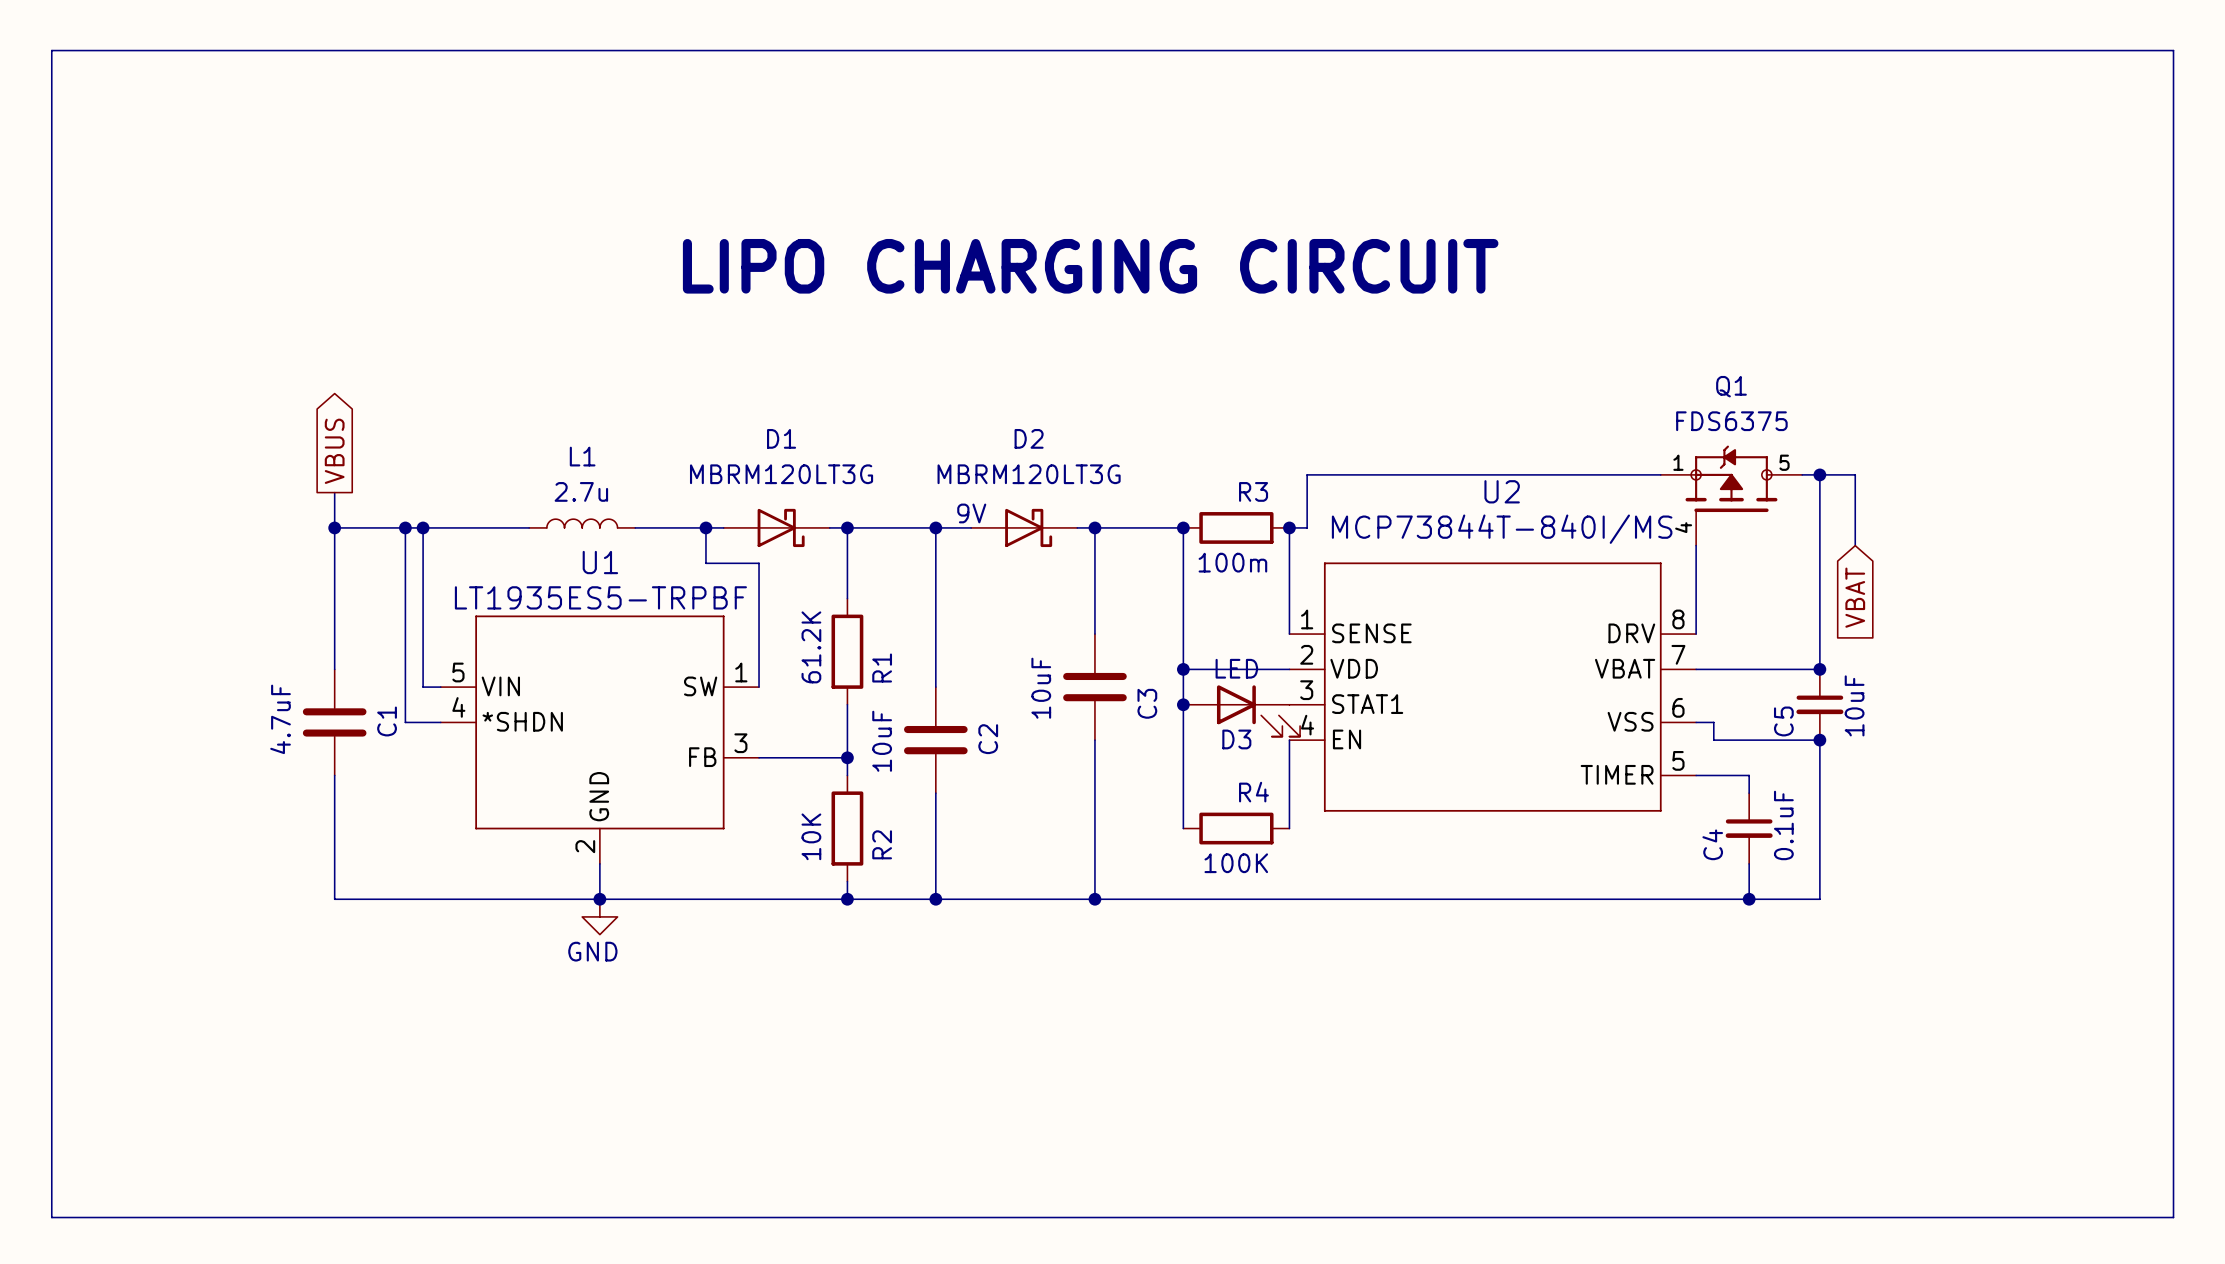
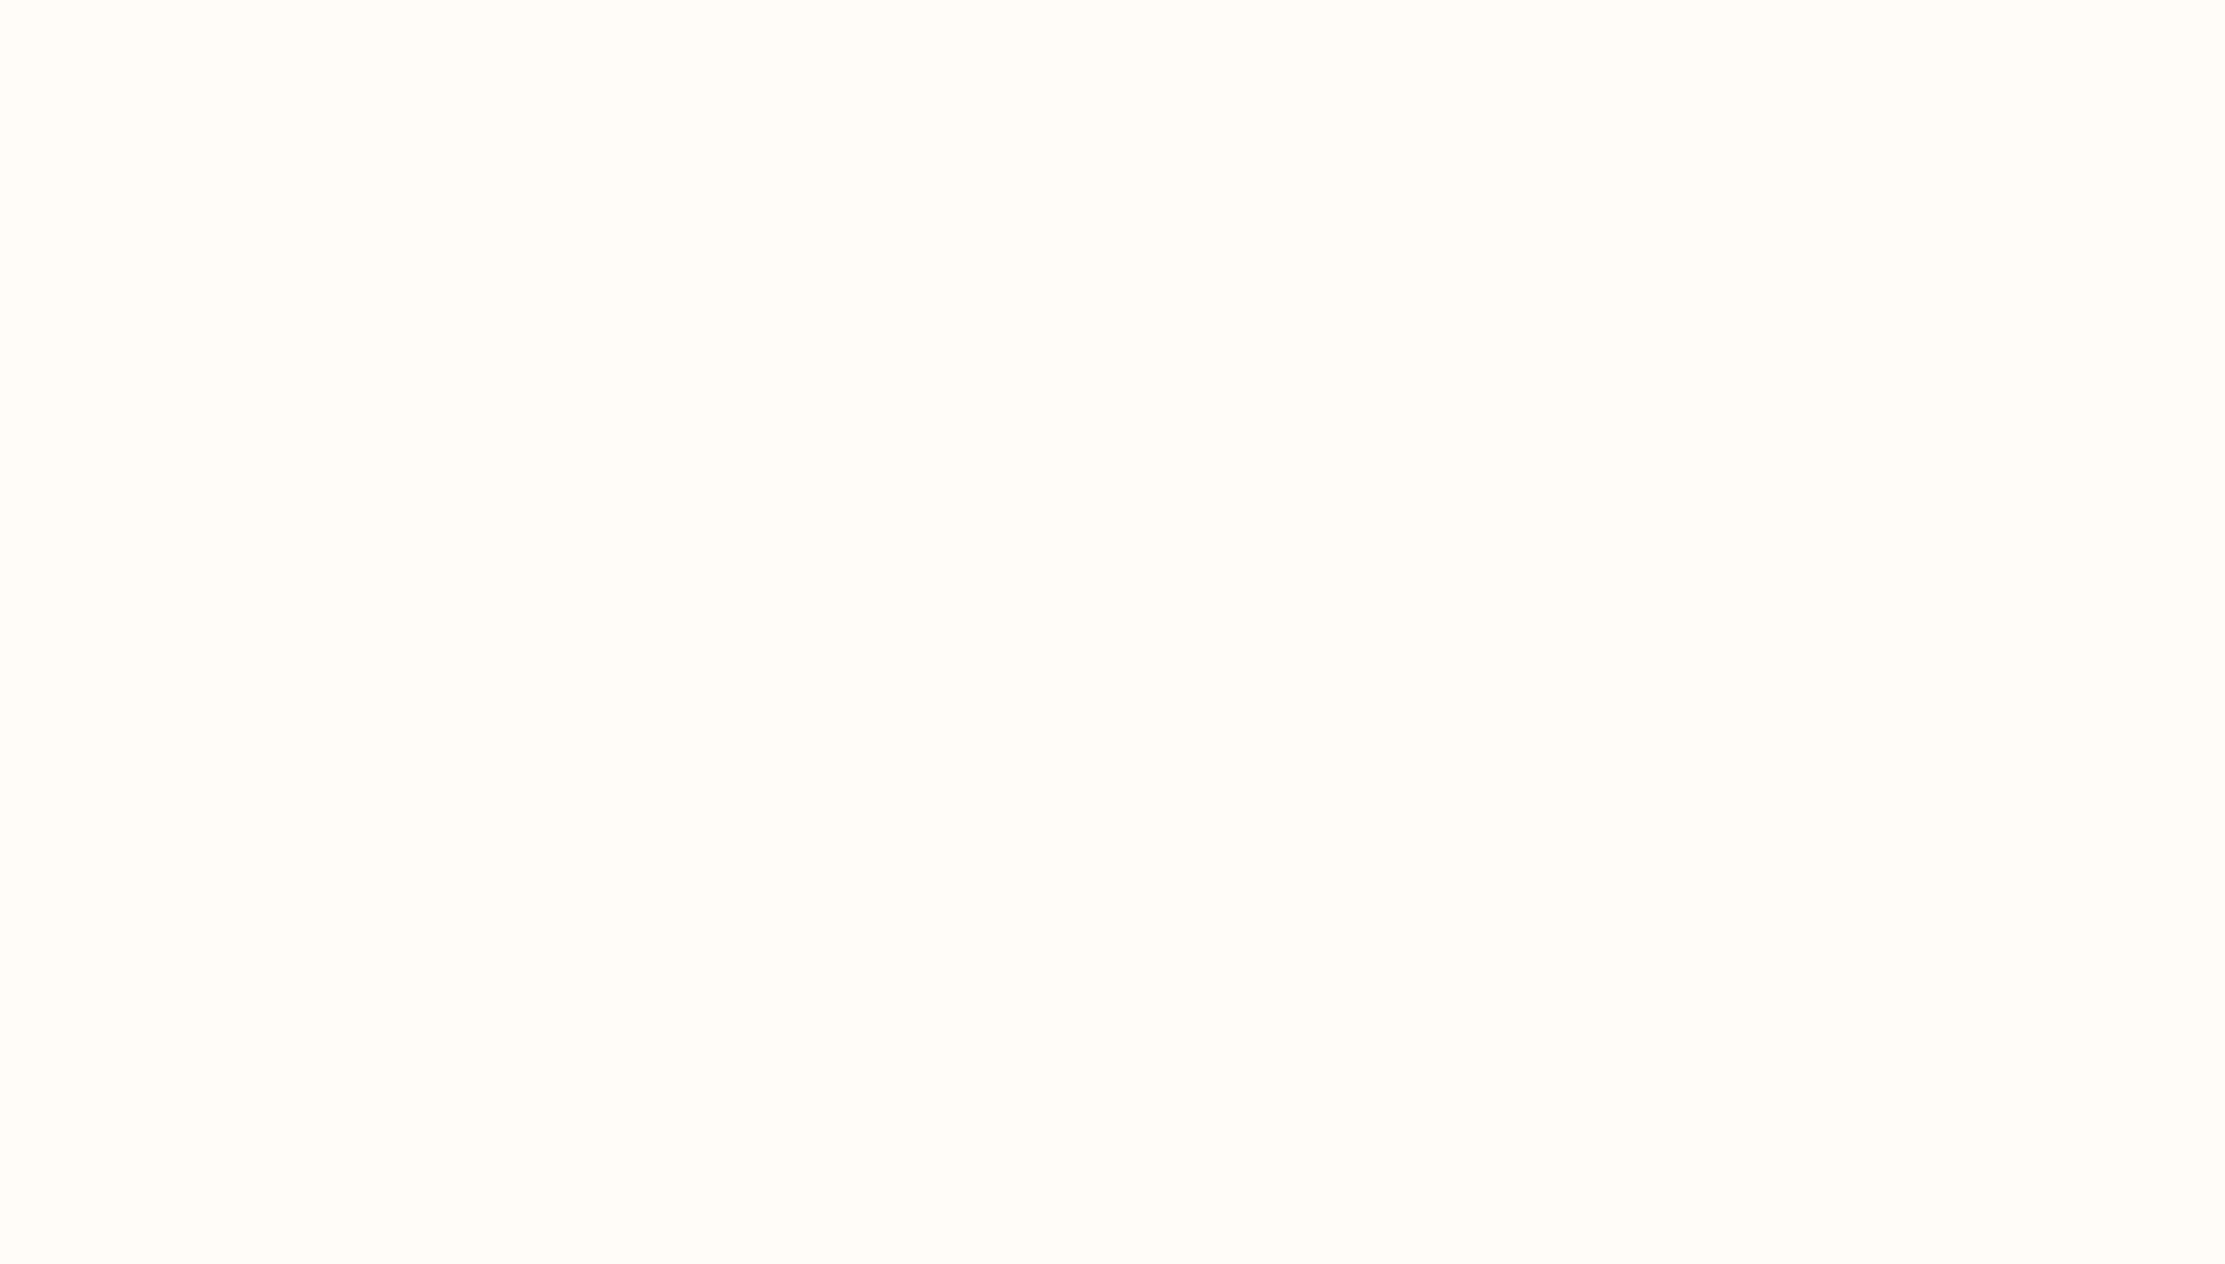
line: (51, 50) (51, 1217) (2173, 1217) (2173, 50) (51, 50) -> none
text: LIPO CHARGING CIRCUIT (1090, 266) -> none
global label: VBUS (334, 451) -> none
wire: (1660, 474) (1307, 474) (1307, 527) (1289, 527) (1289, 634) -> none
wire: (1802, 474) (1855, 474) (1855, 545) -> none
wire: (1819, 474) (1819, 669) (1696, 669) -> none
junction: (1819, 474) -> none
wire: (334, 492) (334, 669) -> none
Q1: FDS6375 (1731, 495) -> none
text: 9V (971, 513) -> none
L1: 2.7u (582, 523) -> none
wire: (334, 527) (529, 527) -> none
junction: (334, 527) -> none
wire: (405, 527) (405, 722) (440, 722) -> none
junction: (405, 527) -> none
wire: (423, 527) (423, 687) (440, 687) -> none
junction: (423, 527) -> none
wire: (635, 527) (723, 527) -> none
wire: (705, 527) (705, 563) (759, 563) (759, 687) -> none
junction: (705, 527) -> none
D1: MBRM120LT3G (776, 527) -> none
wire: (829, 527) (971, 527) -> none
wire: (847, 527) (847, 598) -> none
junction: (847, 527) -> none
wire: (935, 527) (935, 687) -> none
junction: (935, 527) -> none
D2: MBRM120LT3G (1024, 527) -> none
wire: (1077, 527) (1183, 527) (1183, 828) -> none
wire: (1094, 527) (1094, 634) -> none
junction: (1094, 527) -> none
junction: (1183, 527) -> none
R3: 100m (1236, 527) -> none
junction: (1289, 527) -> none
wire: (1696, 545) (1696, 634) -> none
global label: VBAT (1855, 597) -> none
R1: 61.2K (847, 651) -> none
wire: (1183, 669) (1289, 669) -> none
junction: (1183, 669) -> none
junction: (1819, 669) -> none
C3: 10uF (1094, 687) -> none
U2: MCP73844T-840I/MS (1492, 687) -> none
wire: (847, 704) (847, 775) -> none
junction: (1183, 704) -> none
C5: 10uF (1819, 704) -> none
D3: LED (1241, 710) -> none
C1: 4.7uF (334, 722) -> none
wire: (1696, 722) (1713, 722) (1713, 740) (1819, 740) (1819, 899) (334, 899) (334, 775) -> none
U1: LT1935ES5-TRPBF (599, 739) -> none
C2: 10uF (935, 740) -> none
wire: (1094, 740) (1094, 899) -> none
wire: (1289, 740) (1289, 828) -> none
junction: (1819, 740) -> none
wire: (759, 757) (847, 757) -> none
junction: (847, 757) -> none
wire: (1696, 775) (1749, 775) (1749, 793) -> none
wire: (935, 793) (935, 899) -> none
R2: 10K (847, 828) -> none
R4: 100K (1236, 828) -> none
C4: 0.1uF (1749, 828) -> none
wire: (599, 863) (599, 899) -> none
wire: (1749, 863) (1749, 899) -> none
wire: (847, 881) (847, 899) -> none
junction: (599, 899) -> none
junction: (847, 899) -> none
junction: (935, 899) -> none
junction: (1094, 899) -> none
junction: (1749, 899) -> none
power symbol: GND (599, 916) -> none

